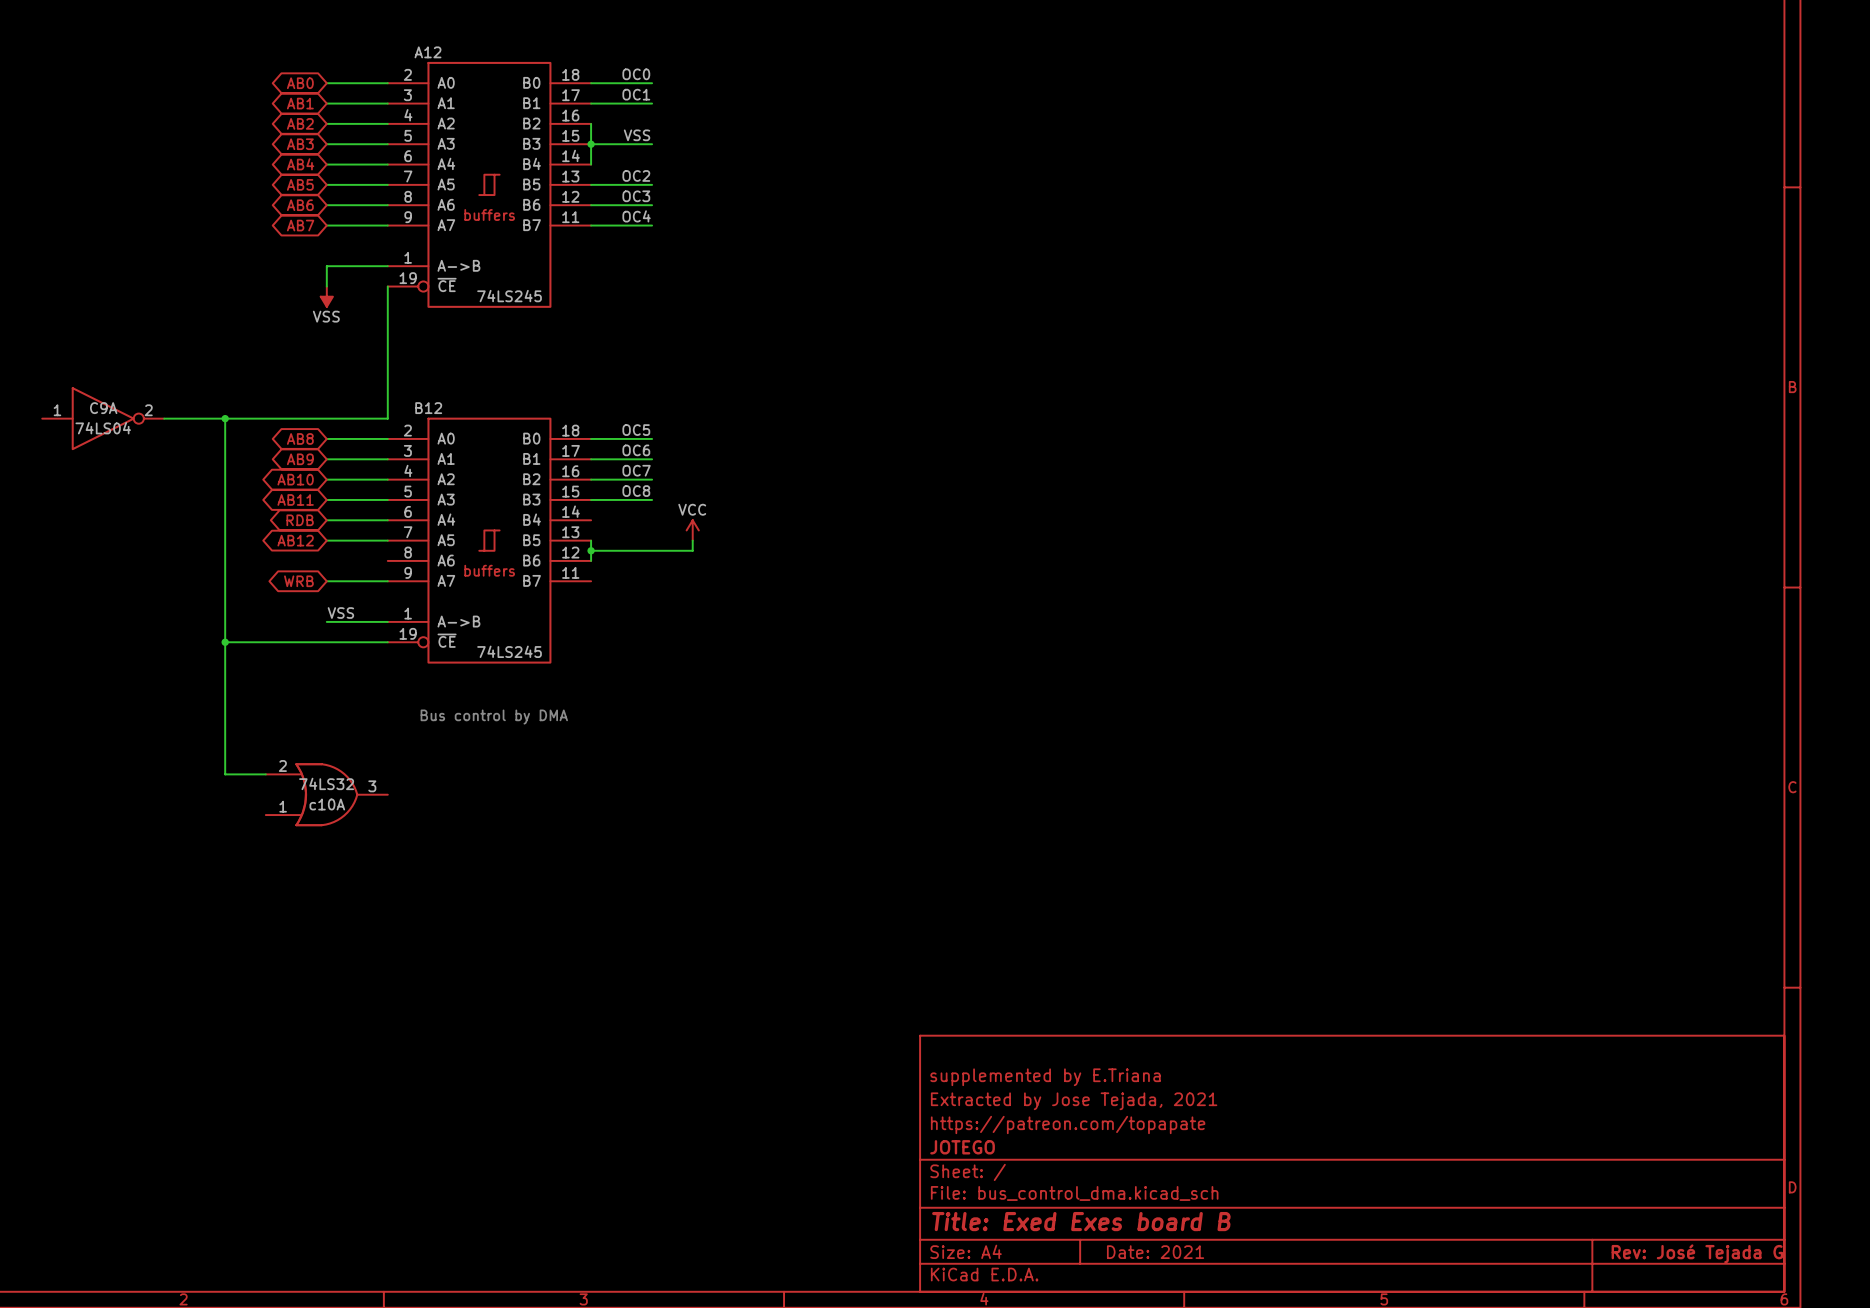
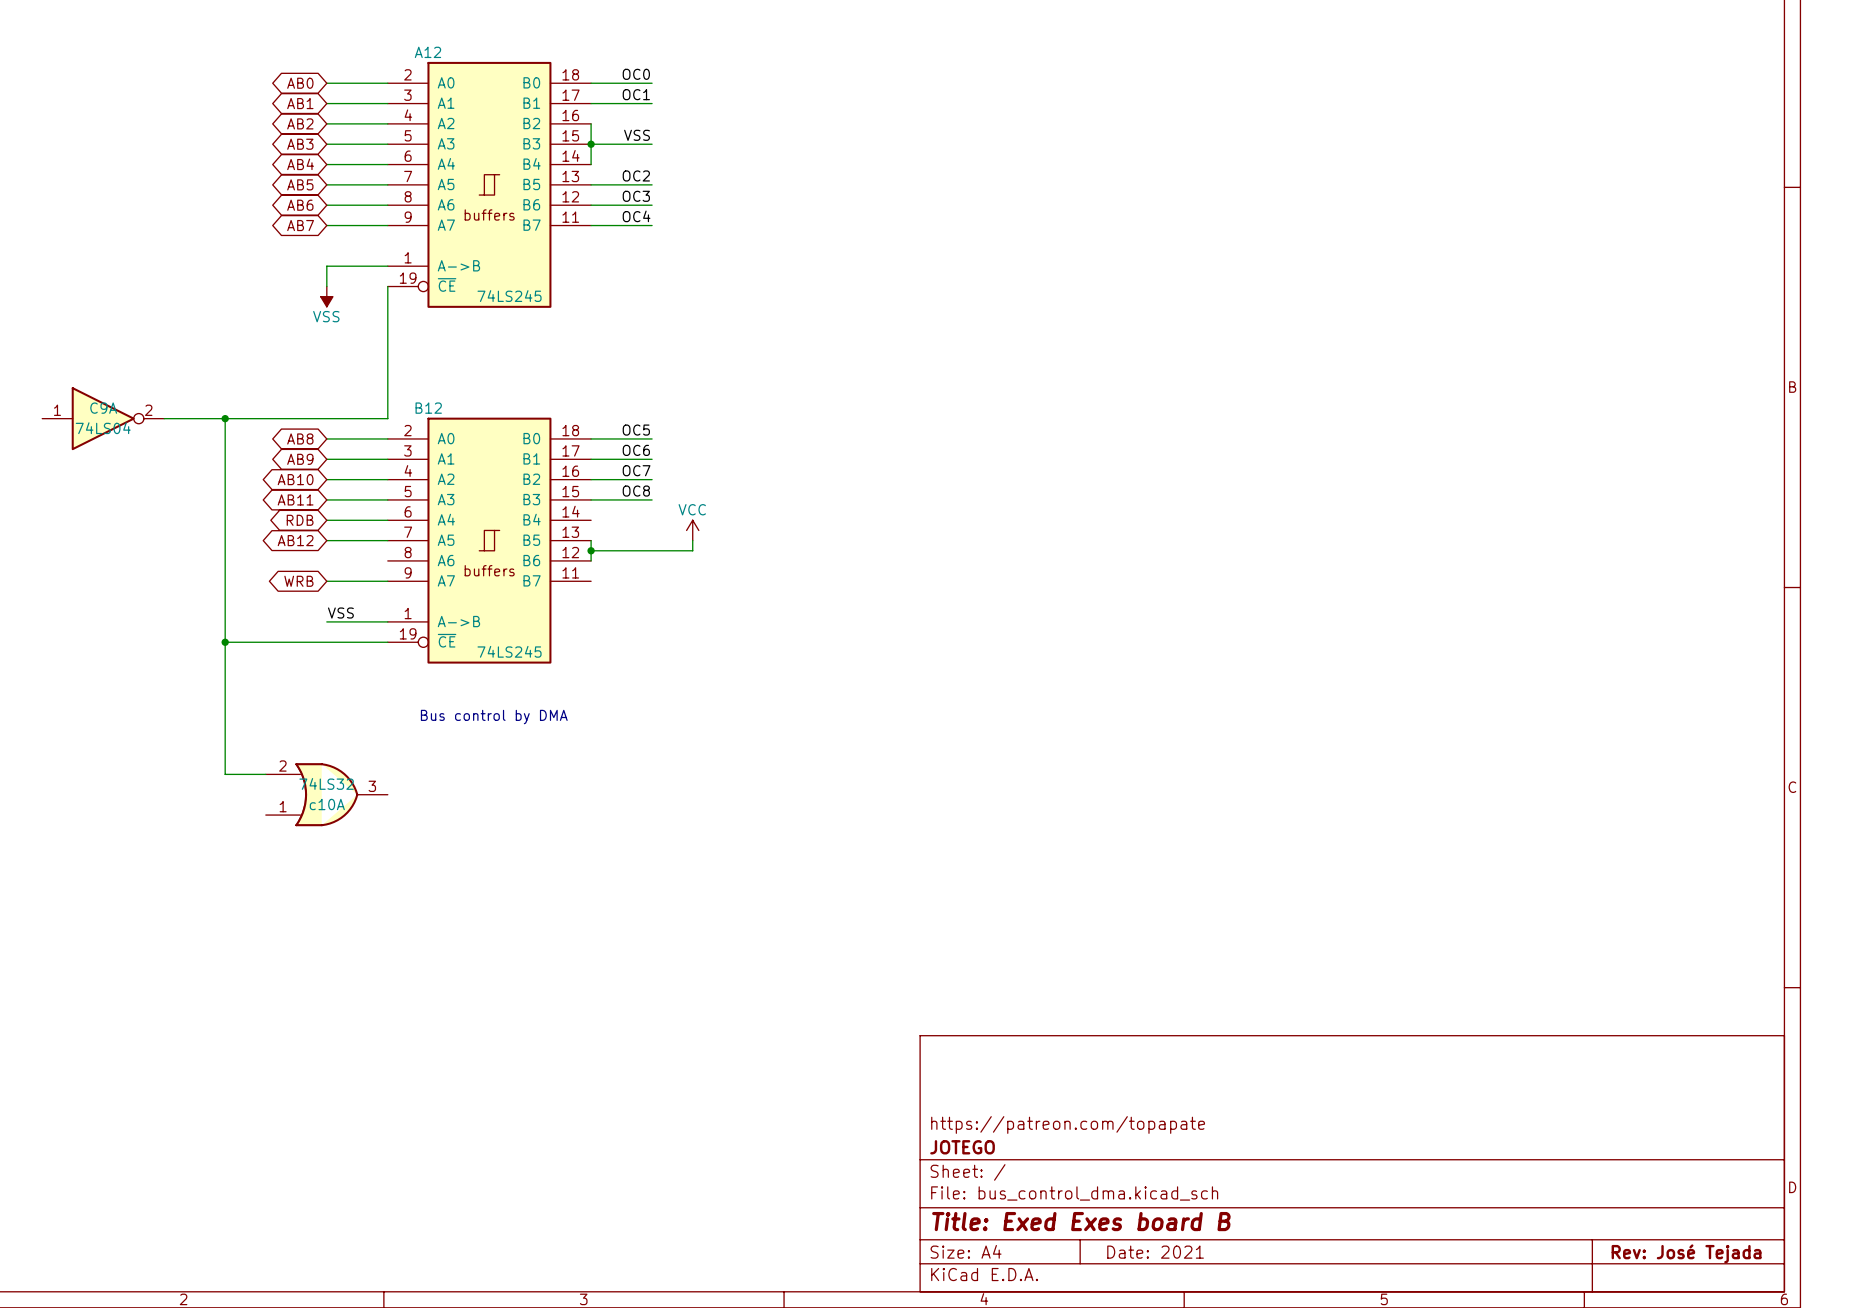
title block: supplemented by E.Triana (1045, 1077) -> none
title block: Extracted by Jose Tejada, 2021 (1074, 1101) -> none
title block: Rev: José Tejada G (1697, 1253) -> Rev: José Tejada (1686, 1253)

